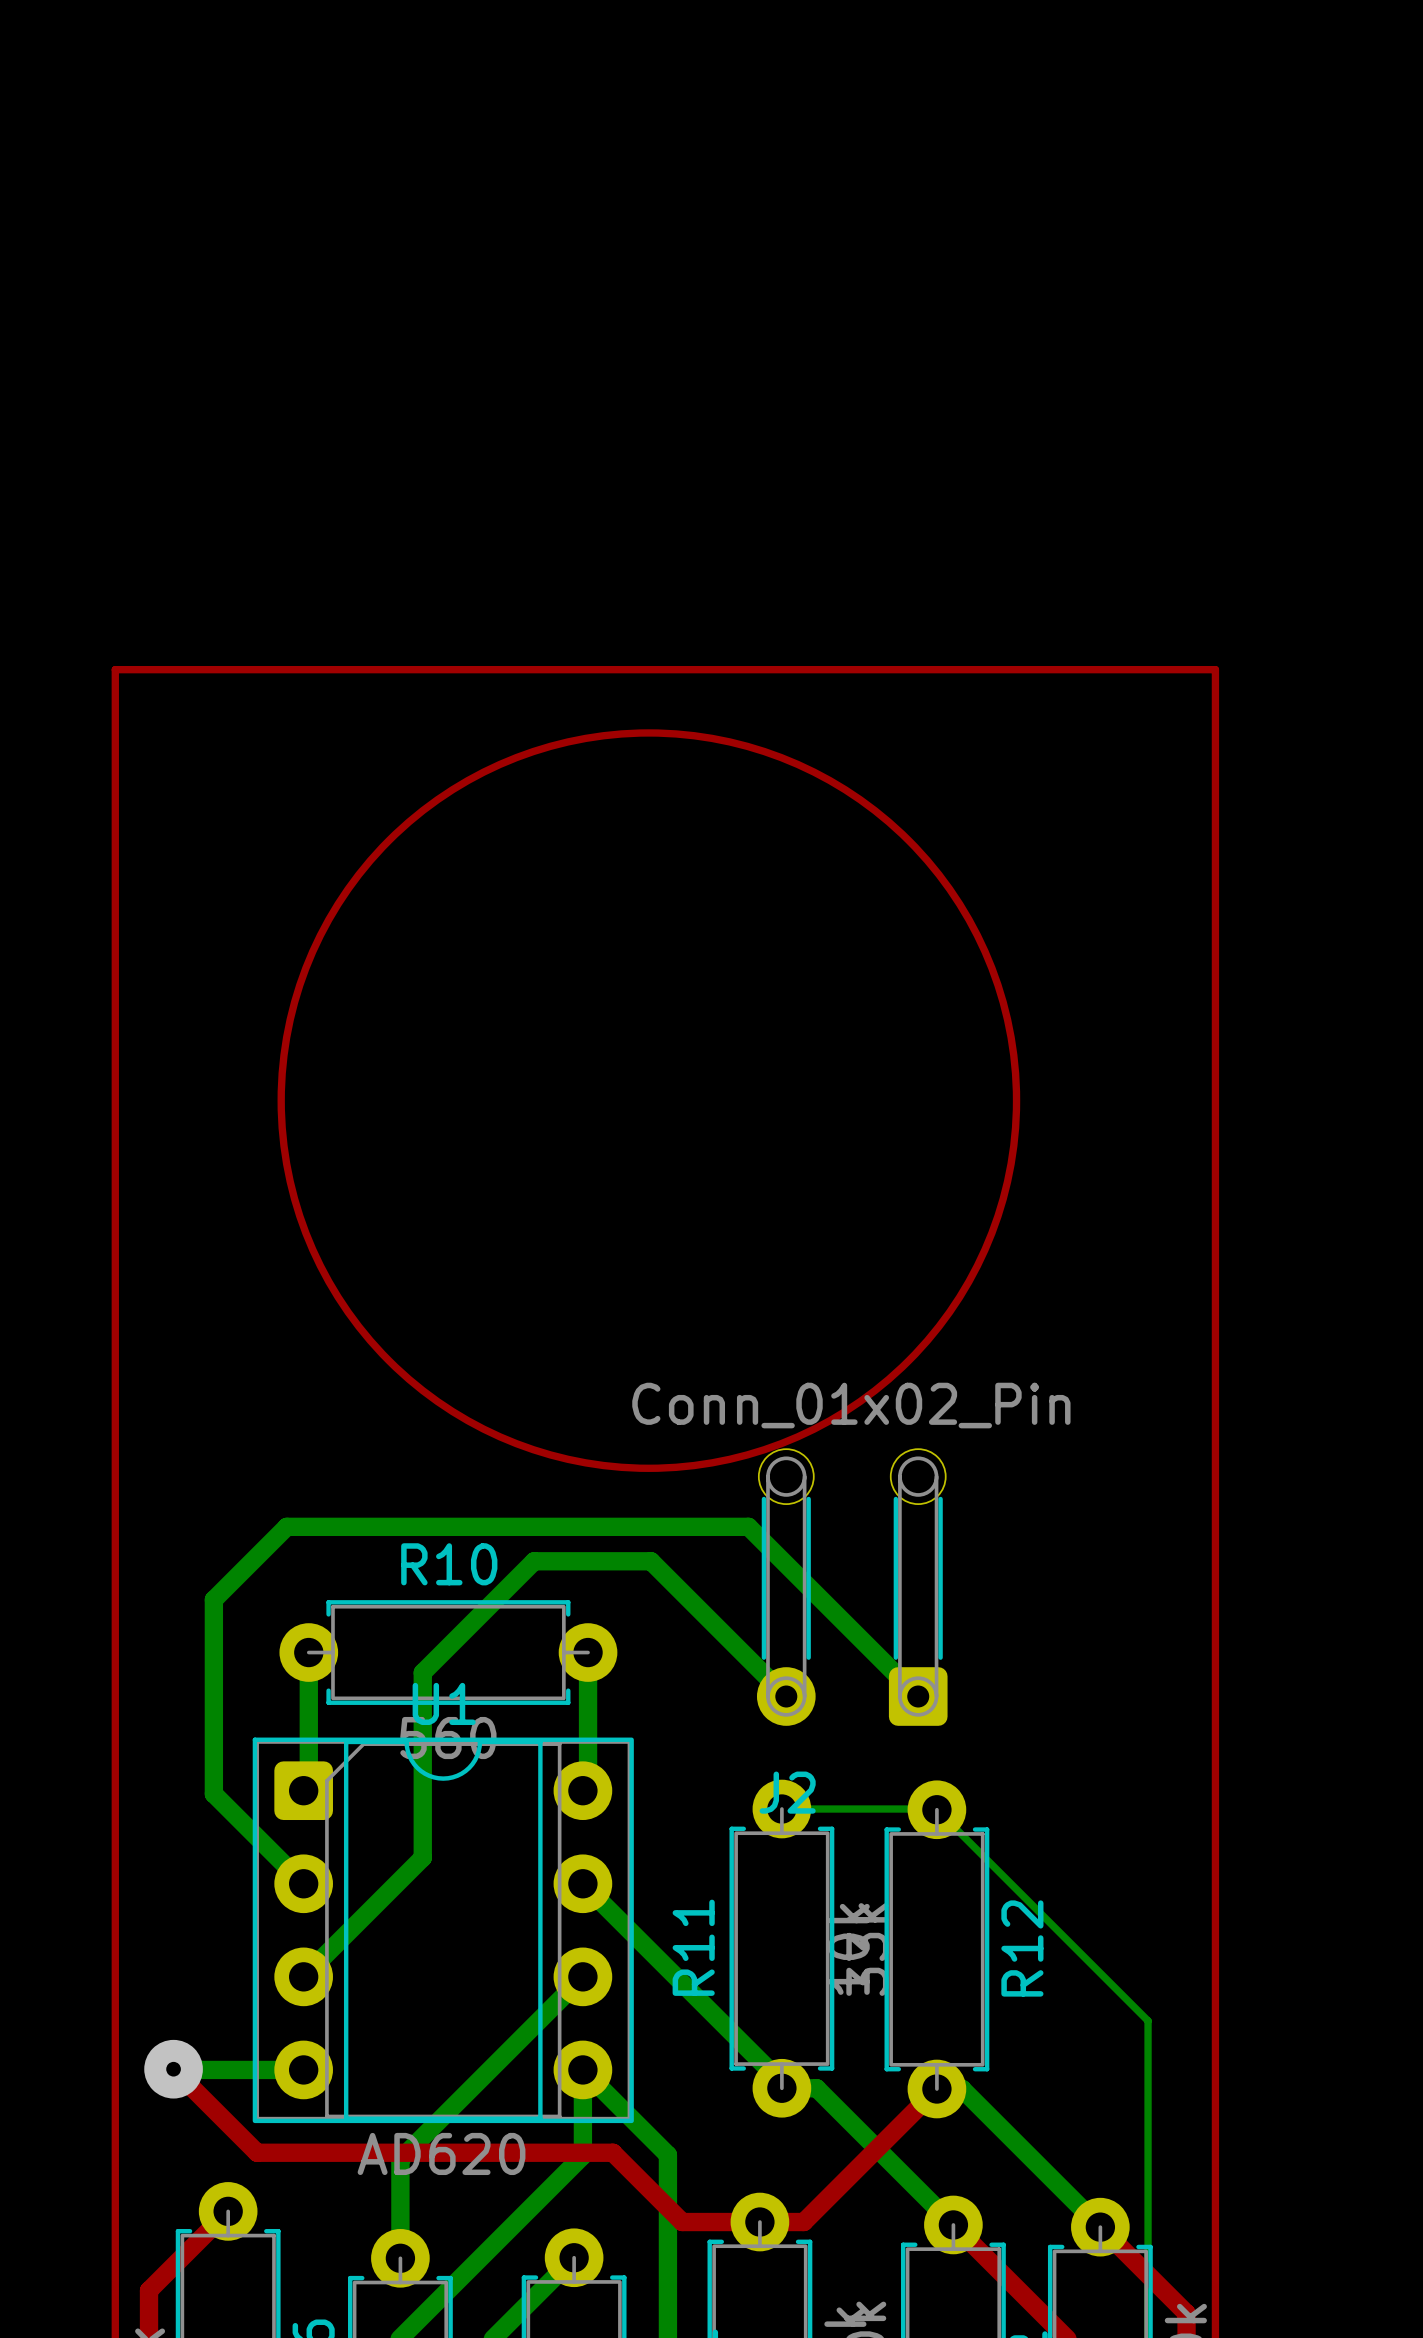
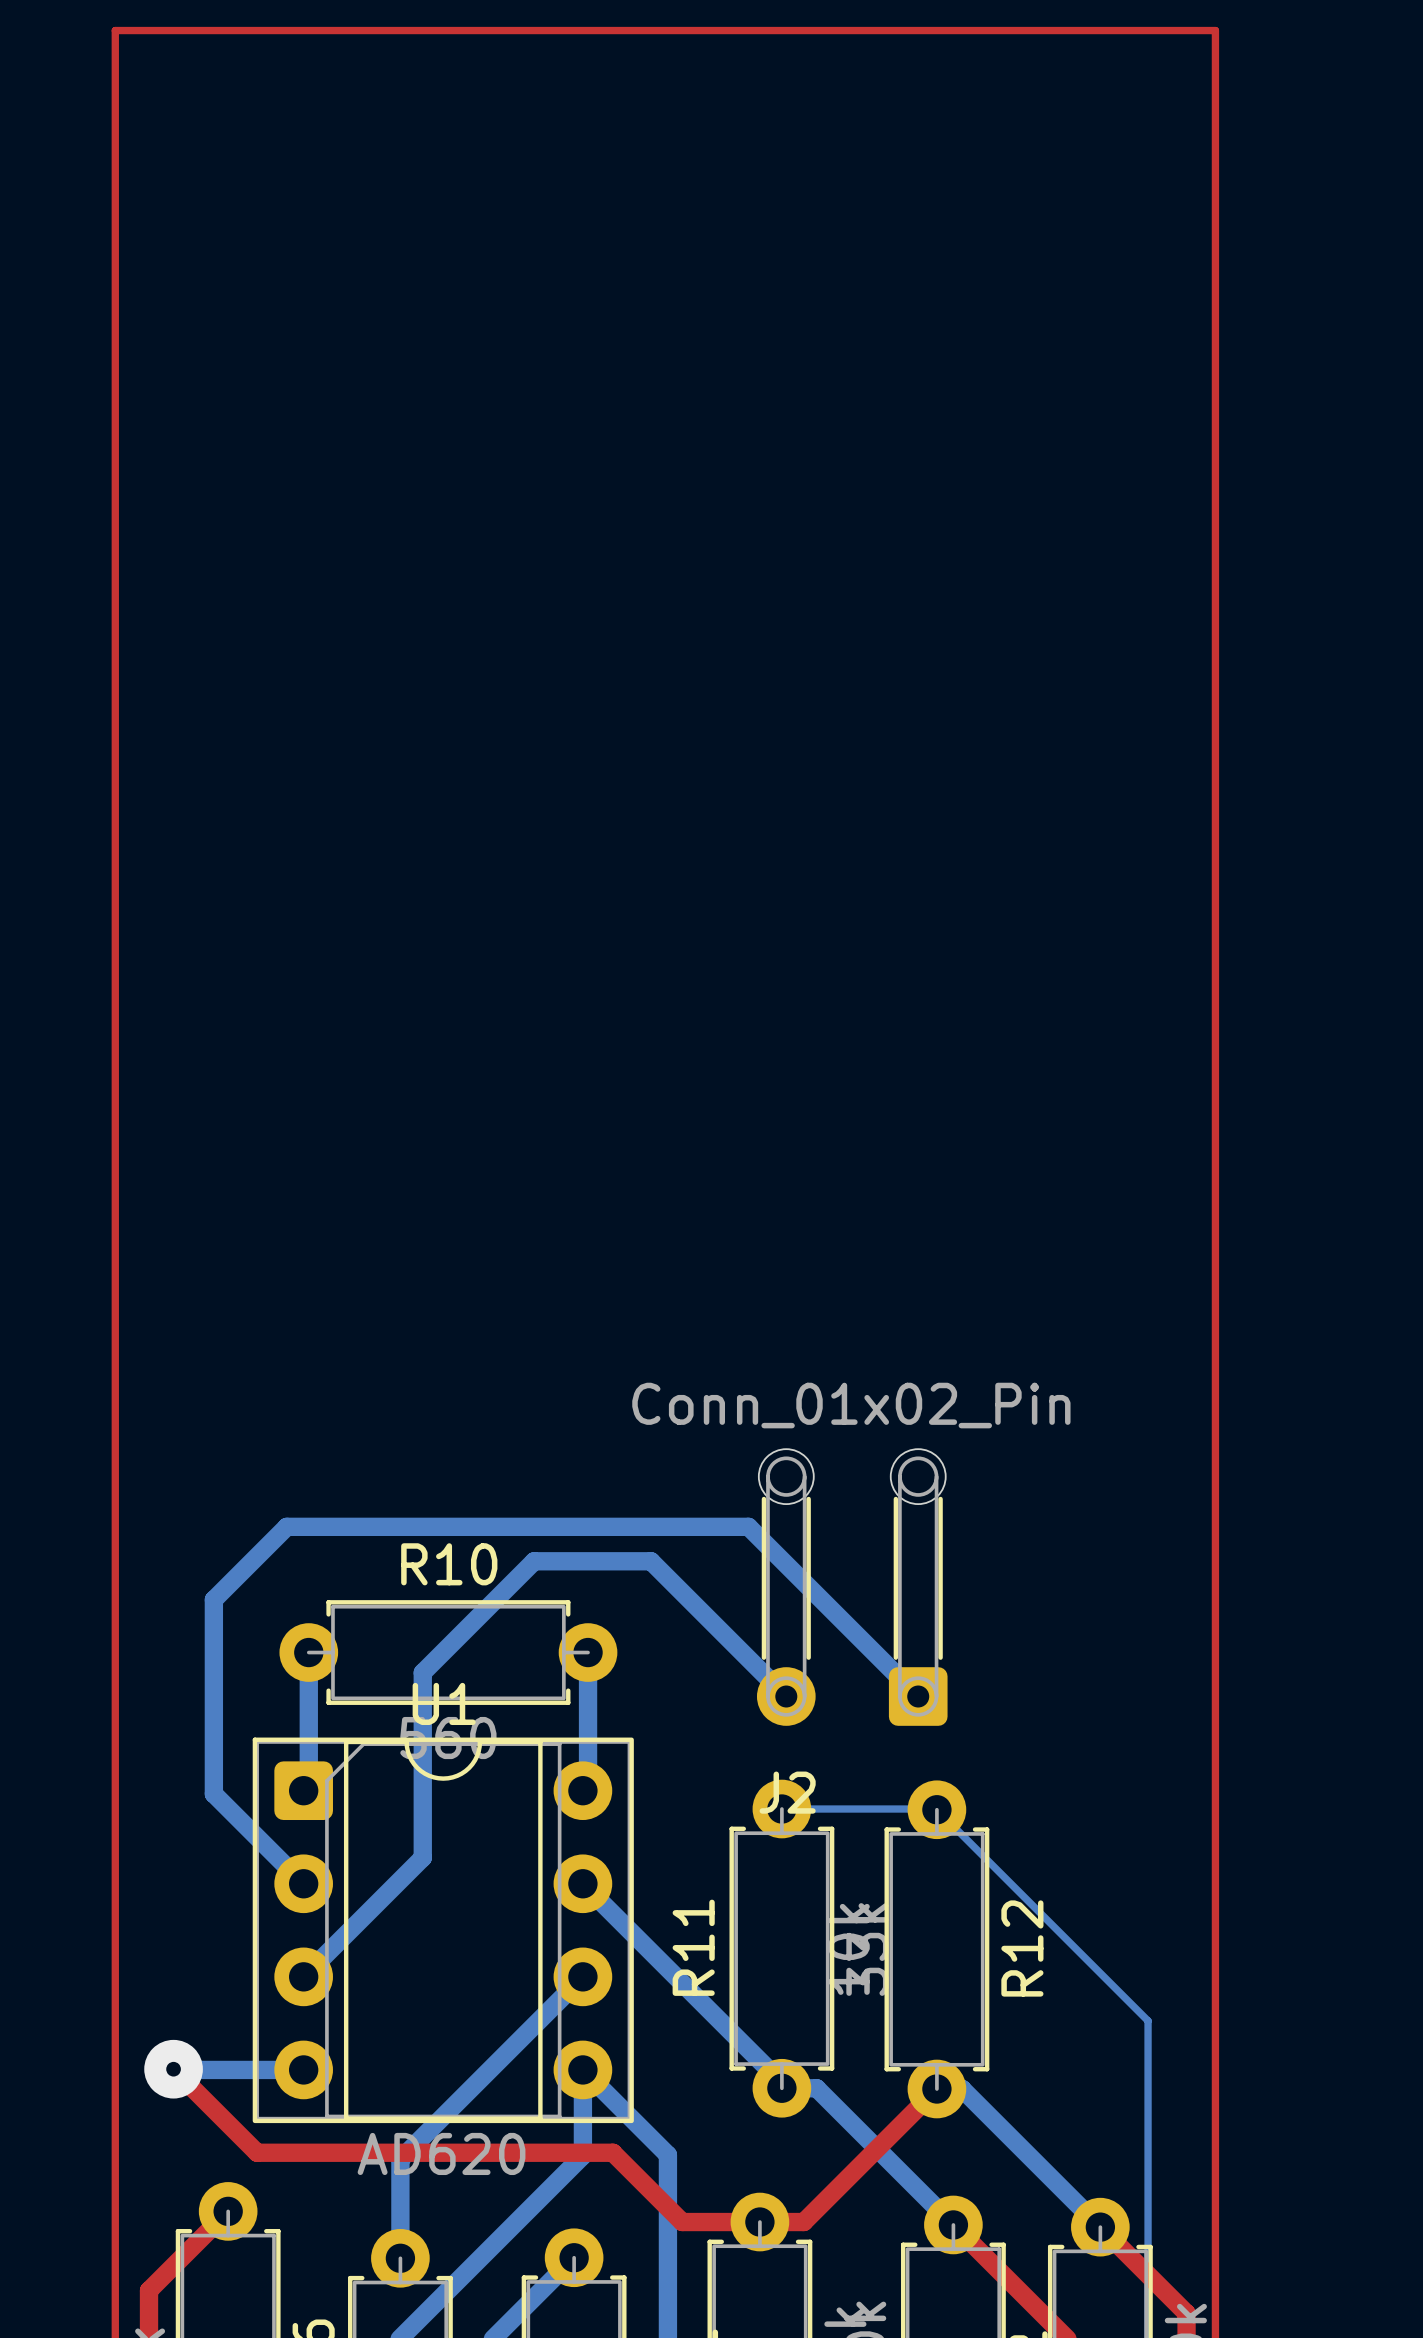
top track: (115, 669) (1215, 669) -> (115, 669) (115, 30) (1215, 30) (1215, 669)
drawing: [277, 729, 1021, 1472] -> none

